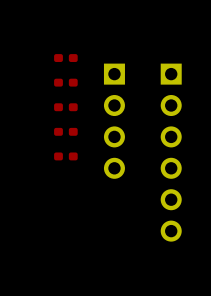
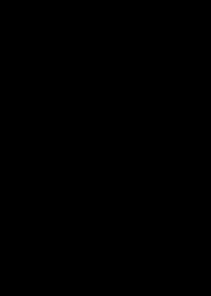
part: (65, 58) -> none
part: (65, 82) -> none
part: (65, 107) -> none
part: (114, 121) -> none
part: (65, 131) -> none
part: (171, 152) -> none
part: (65, 156) -> none

